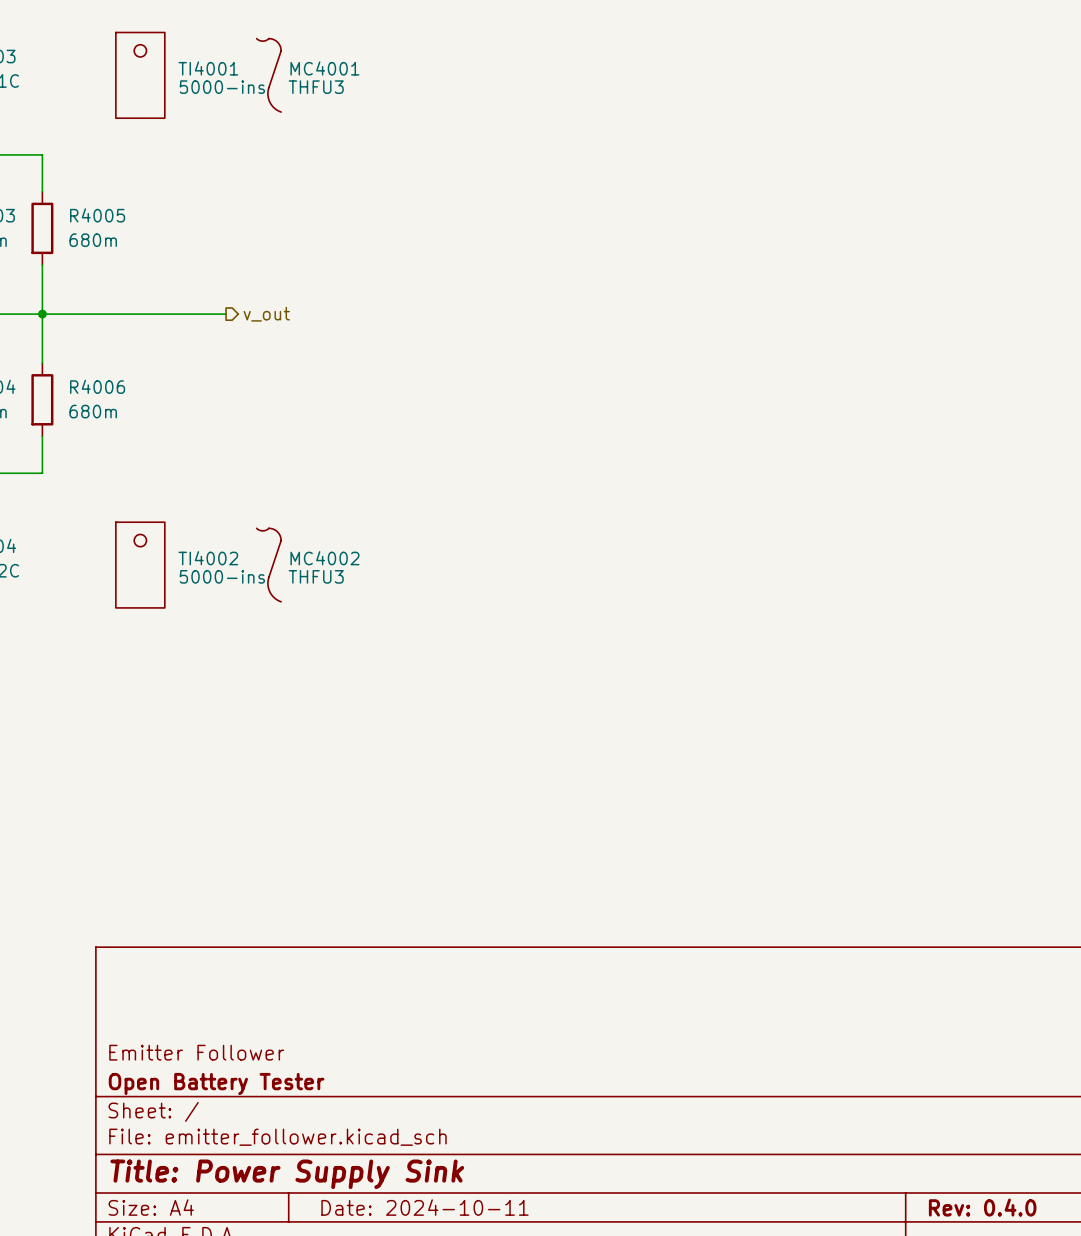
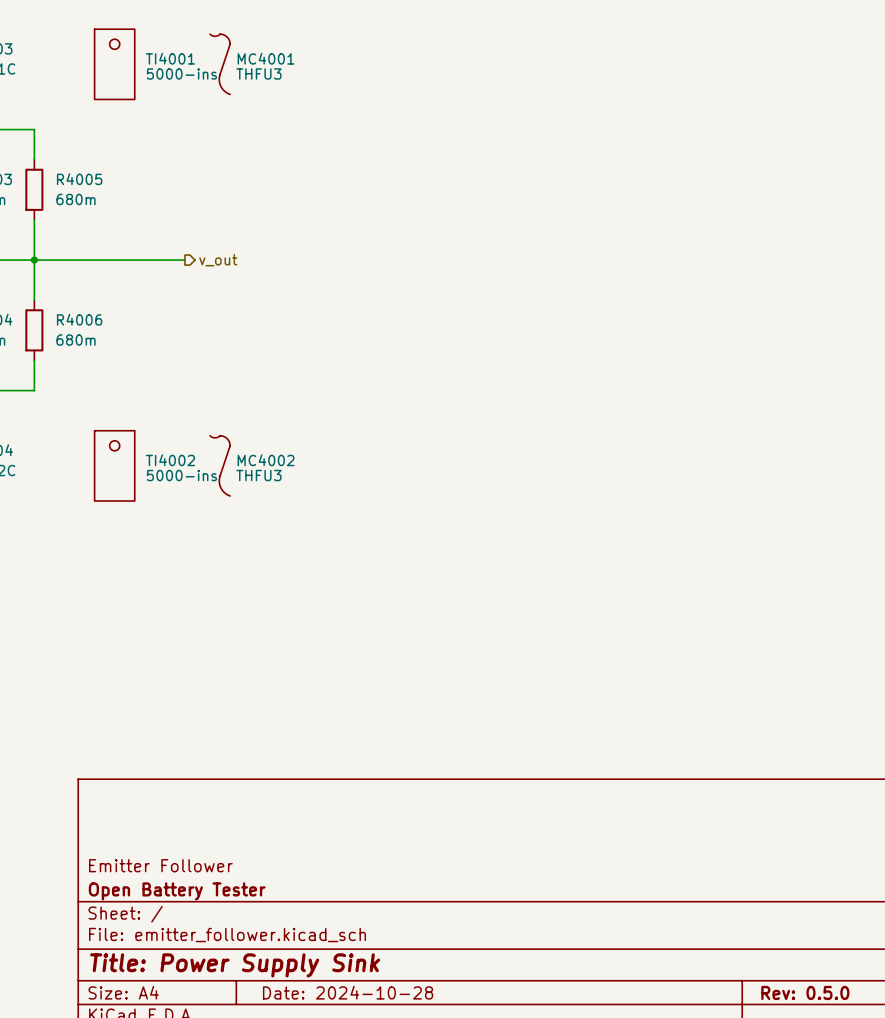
title block: Date: 2024-10-11 (424, 1207) -> Date: 2024-10-28 (348, 992)
title block: Rev: 0.4.0 (982, 1207) -> Rev: 0.5.0 (805, 992)

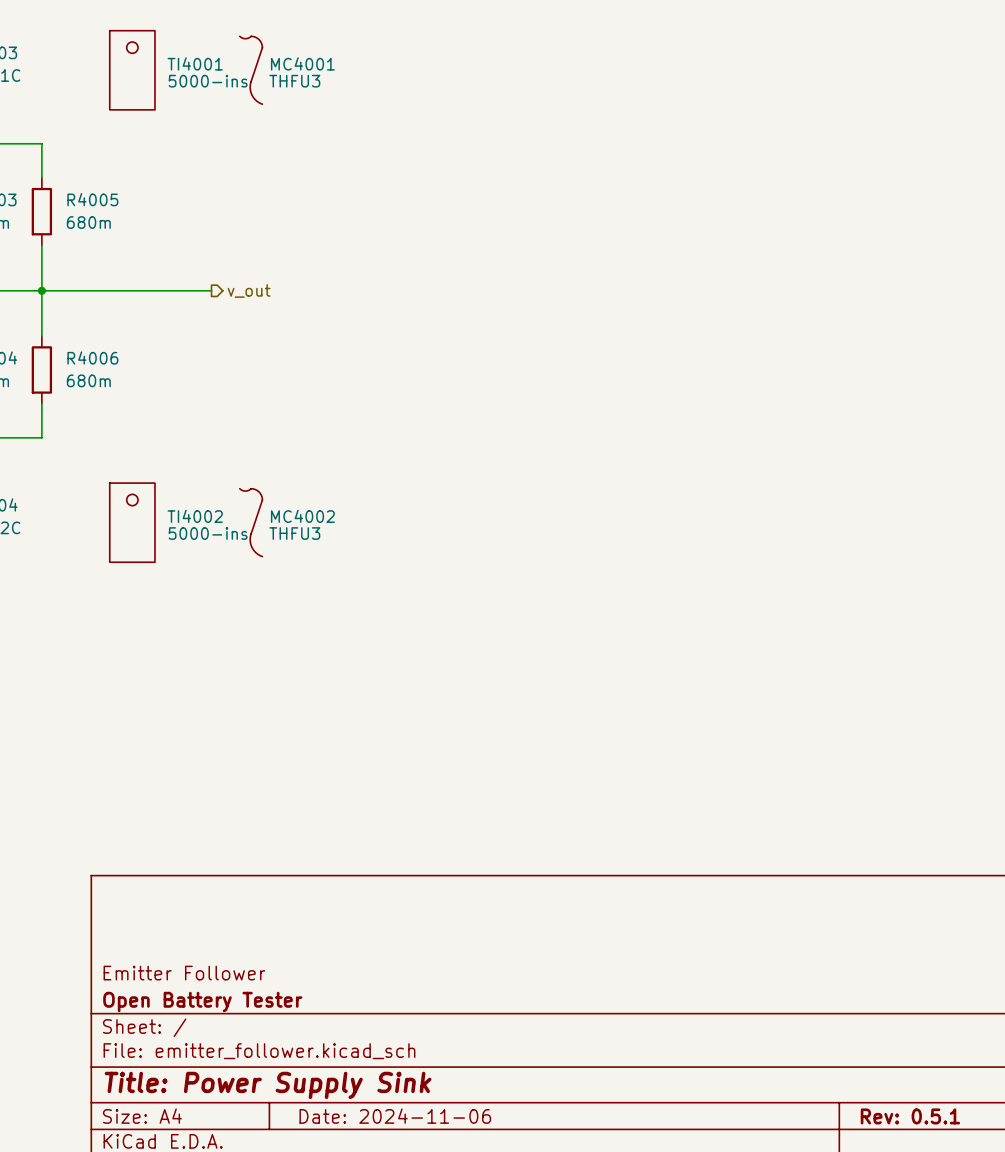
title block: Date: 2024-10-28 (348, 992) -> Date: 2024-11-06 (395, 1116)
title block: Rev: 0.5.0 (805, 992) -> Rev: 0.5.1 (910, 1116)

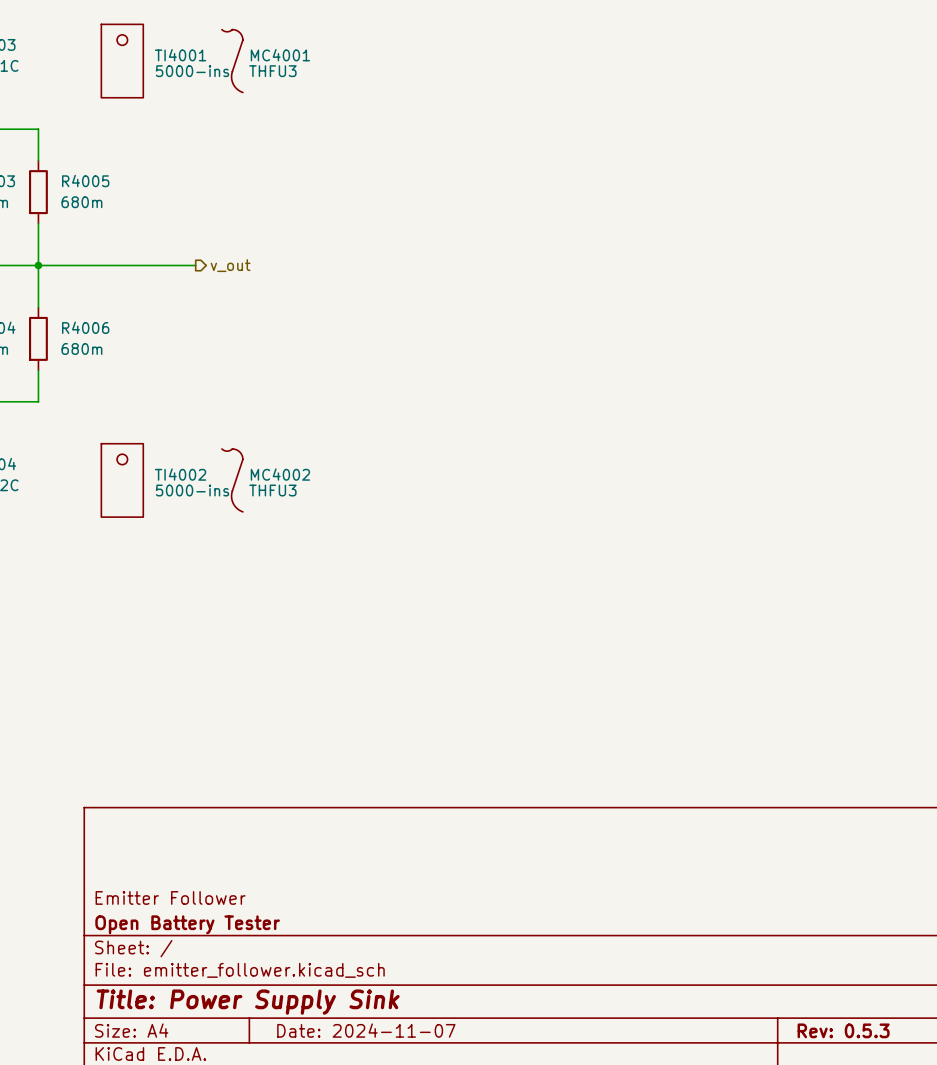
title block: Date: 2024-11-06 (395, 1116) -> Date: 2024-11-07 (366, 1030)
title block: Rev: 0.5.1 (910, 1116) -> Rev: 0.5.3 (843, 1030)

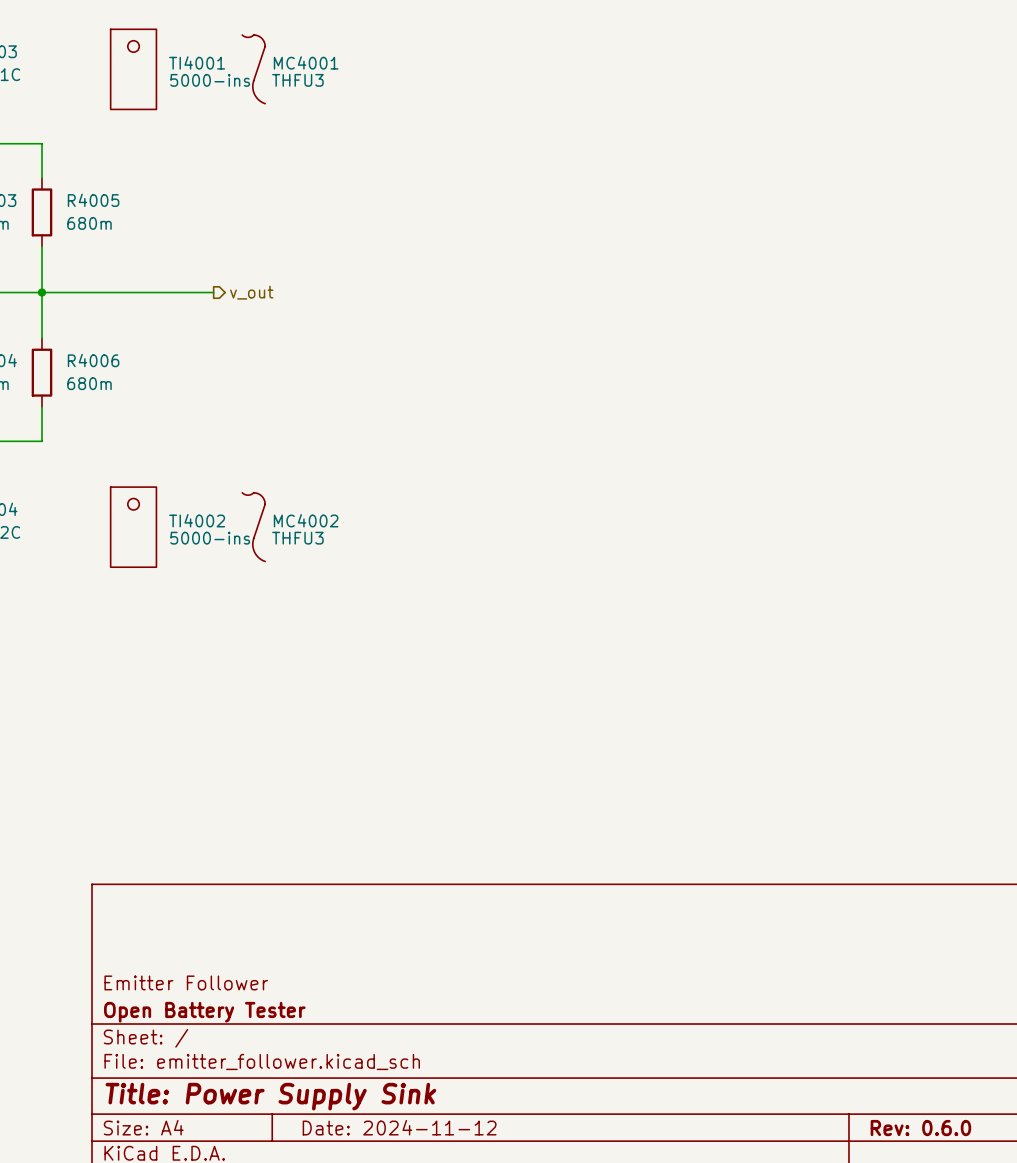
title block: Date: 2024-11-07 (366, 1030) -> Date: 2024-11-12 (399, 1127)
title block: Rev: 0.5.3 (843, 1030) -> Rev: 0.6.0 (920, 1128)

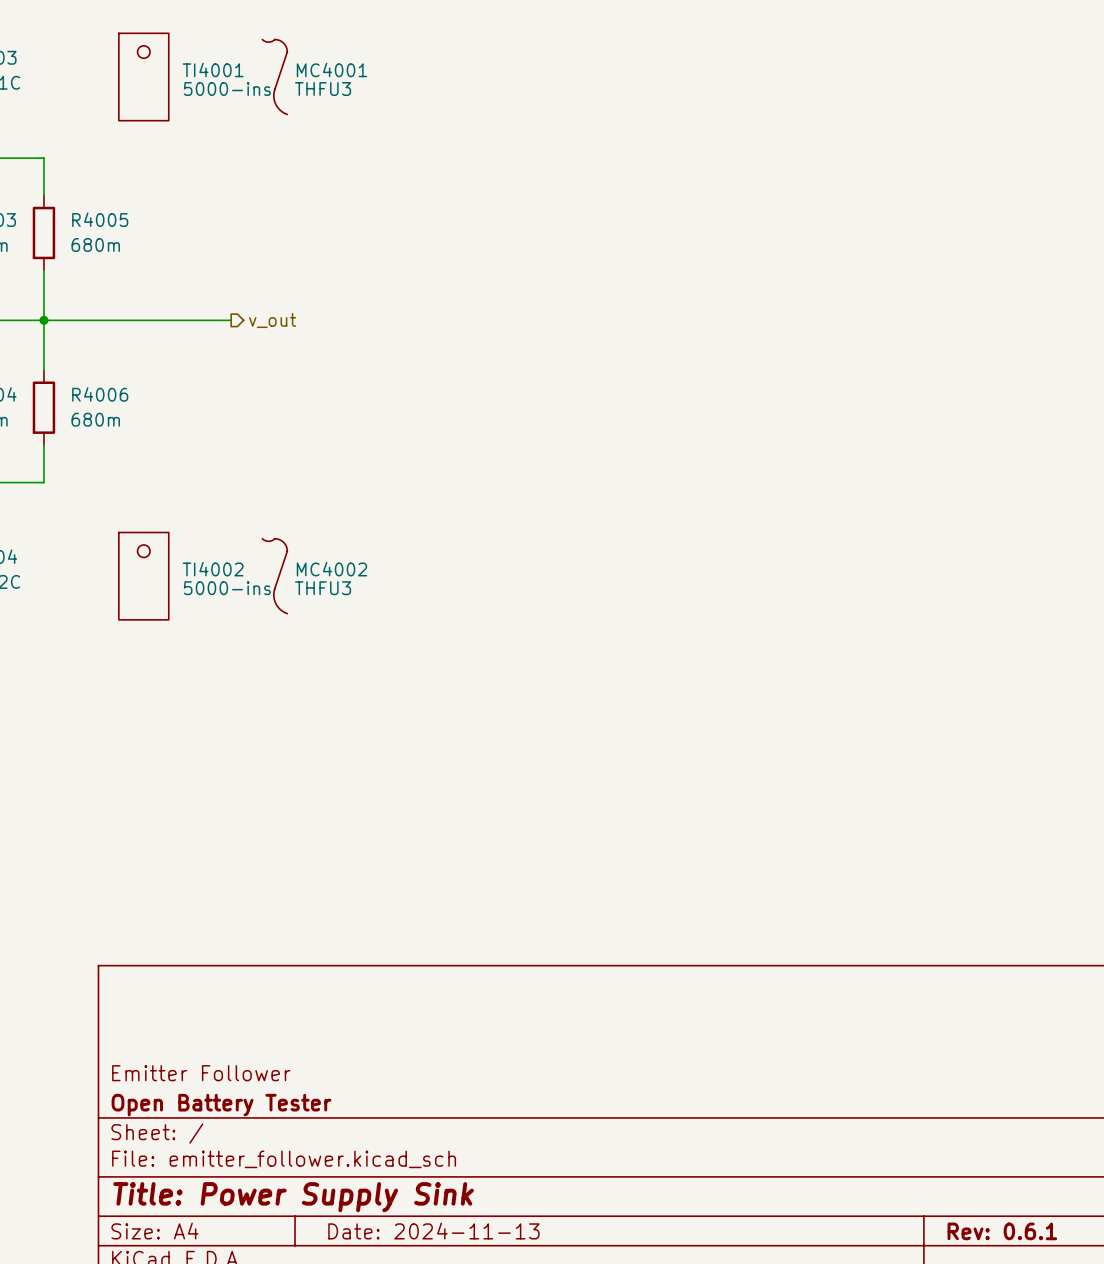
title block: Date: 2024-11-12 (399, 1127) -> Date: 2024-11-13 (433, 1231)
title block: Rev: 0.6.0 (920, 1128) -> Rev: 0.6.1 (1002, 1231)

